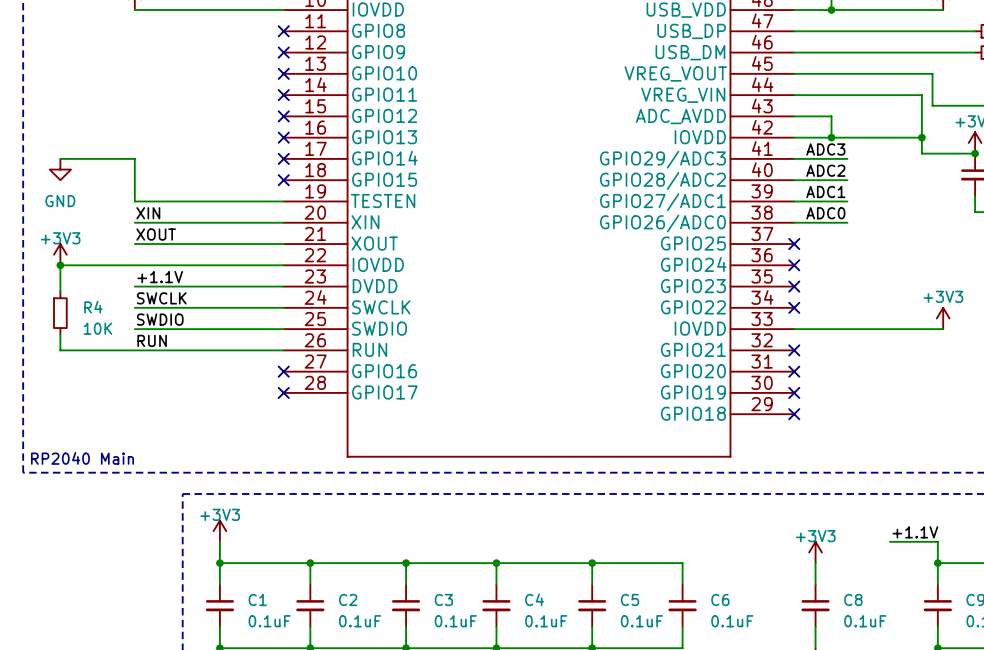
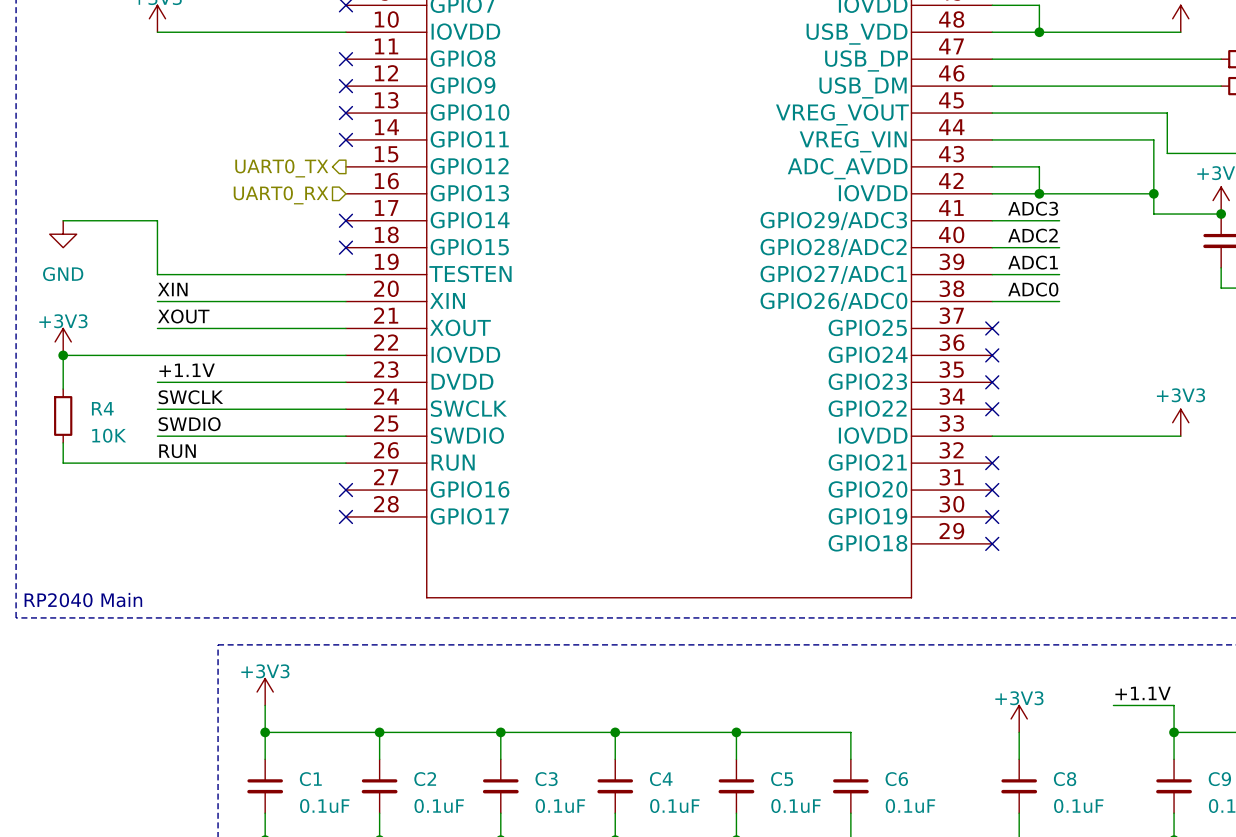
hierarchical label: none -> UART0_TX (281, 168)
no-connect mark: (283, 116) -> none
hierarchical label: none -> UART0_RX (281, 195)
no-connect mark: (283, 137) -> none

